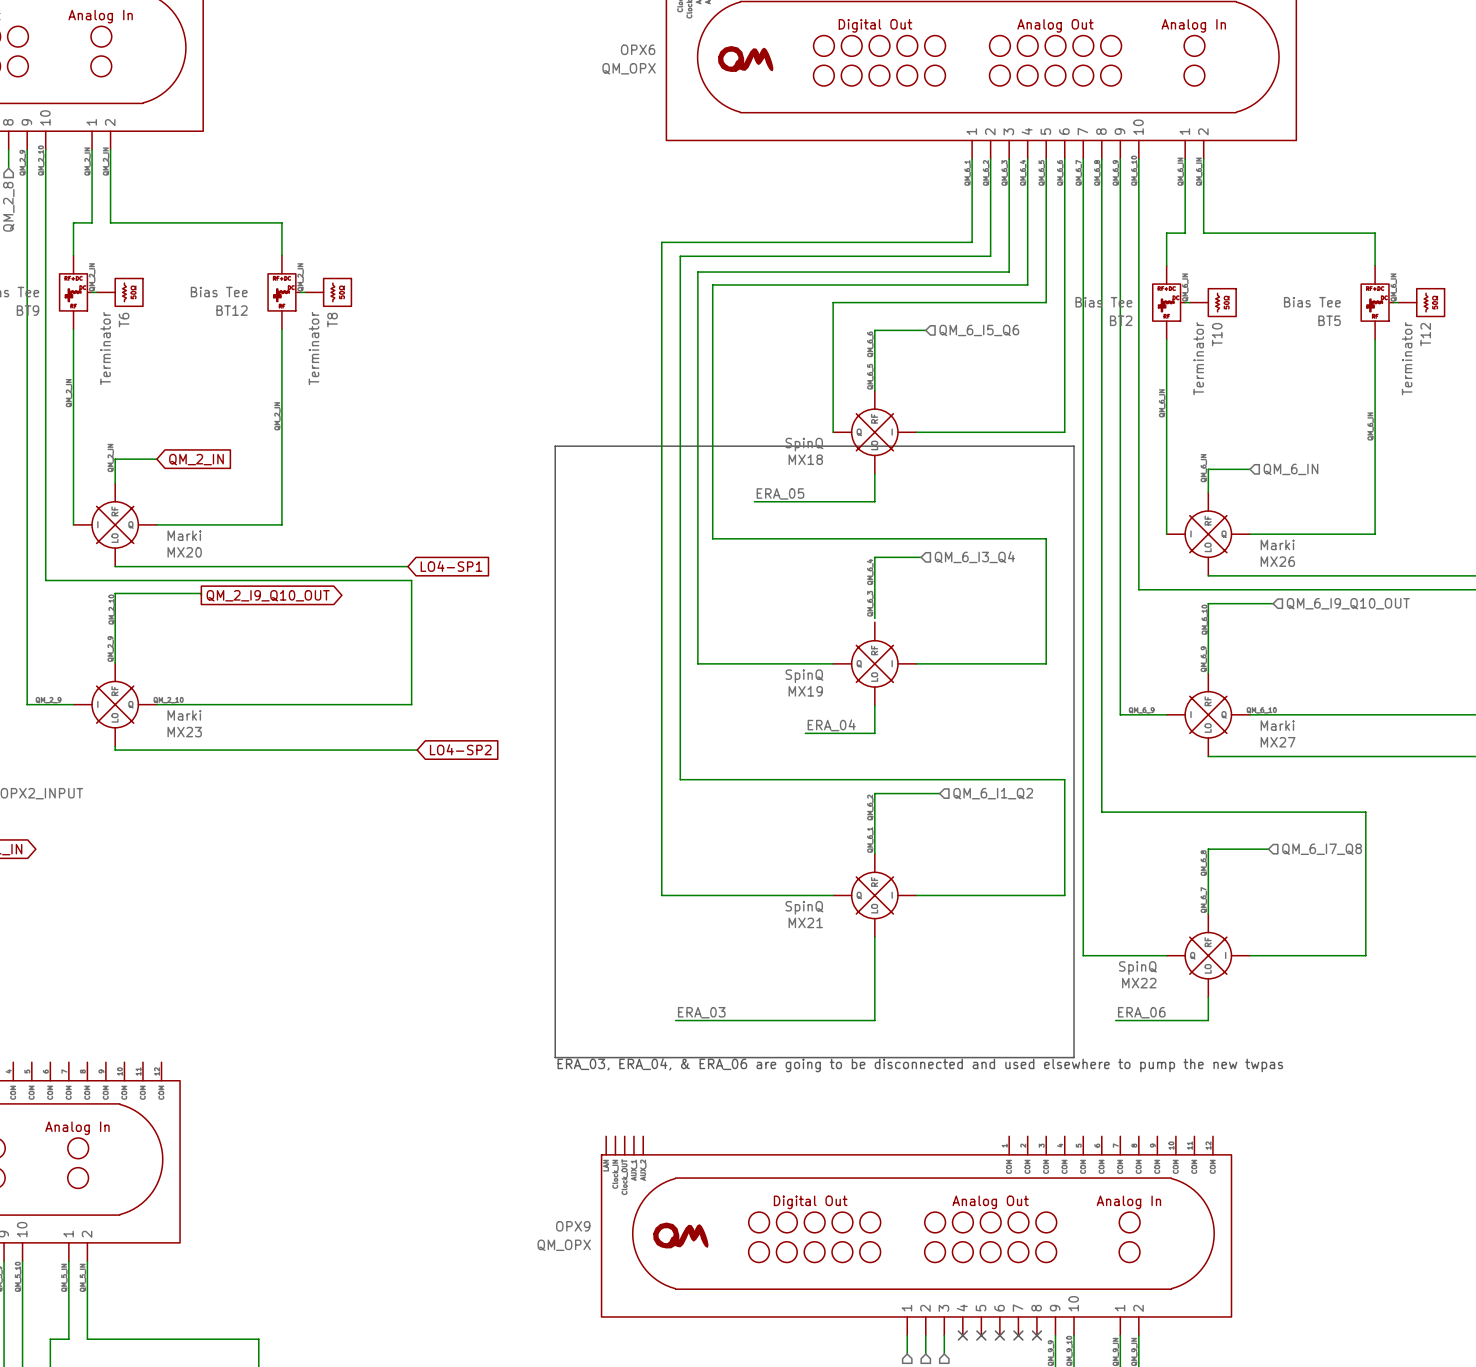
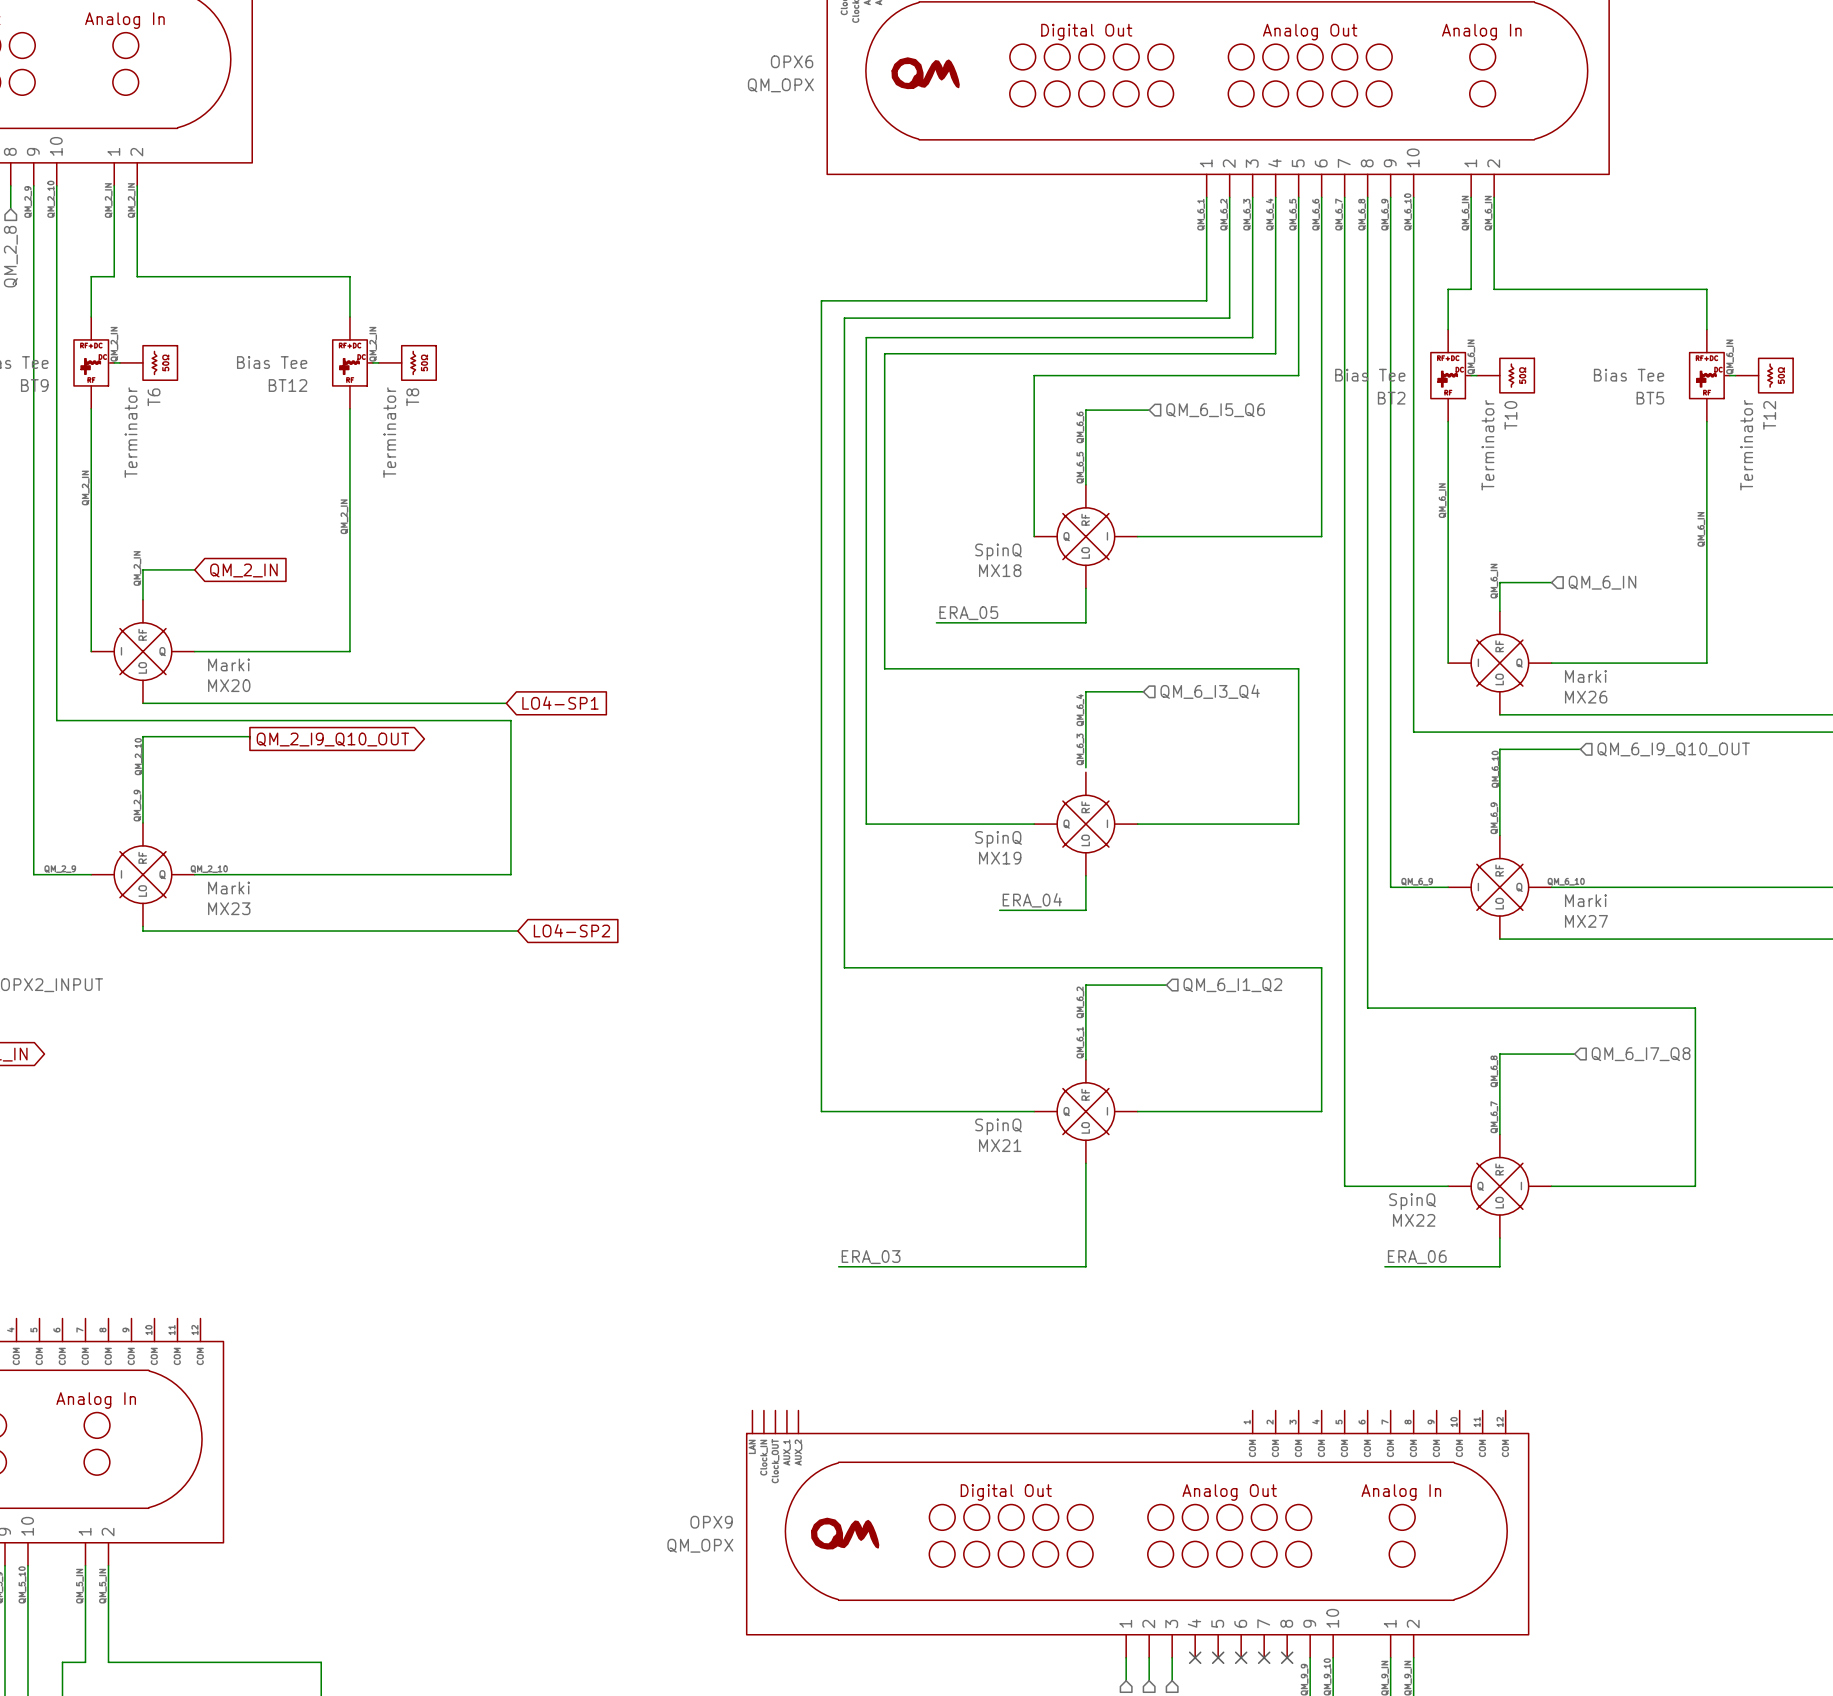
line: (555, 446) (1074, 446) (1074, 1057) (555, 1057) (555, 446) -> none
text: ERA_03, ERA_04, & ERA_06 are going to be disconnected and used elsewhere to pump the new twpas (920, 1065) -> none

